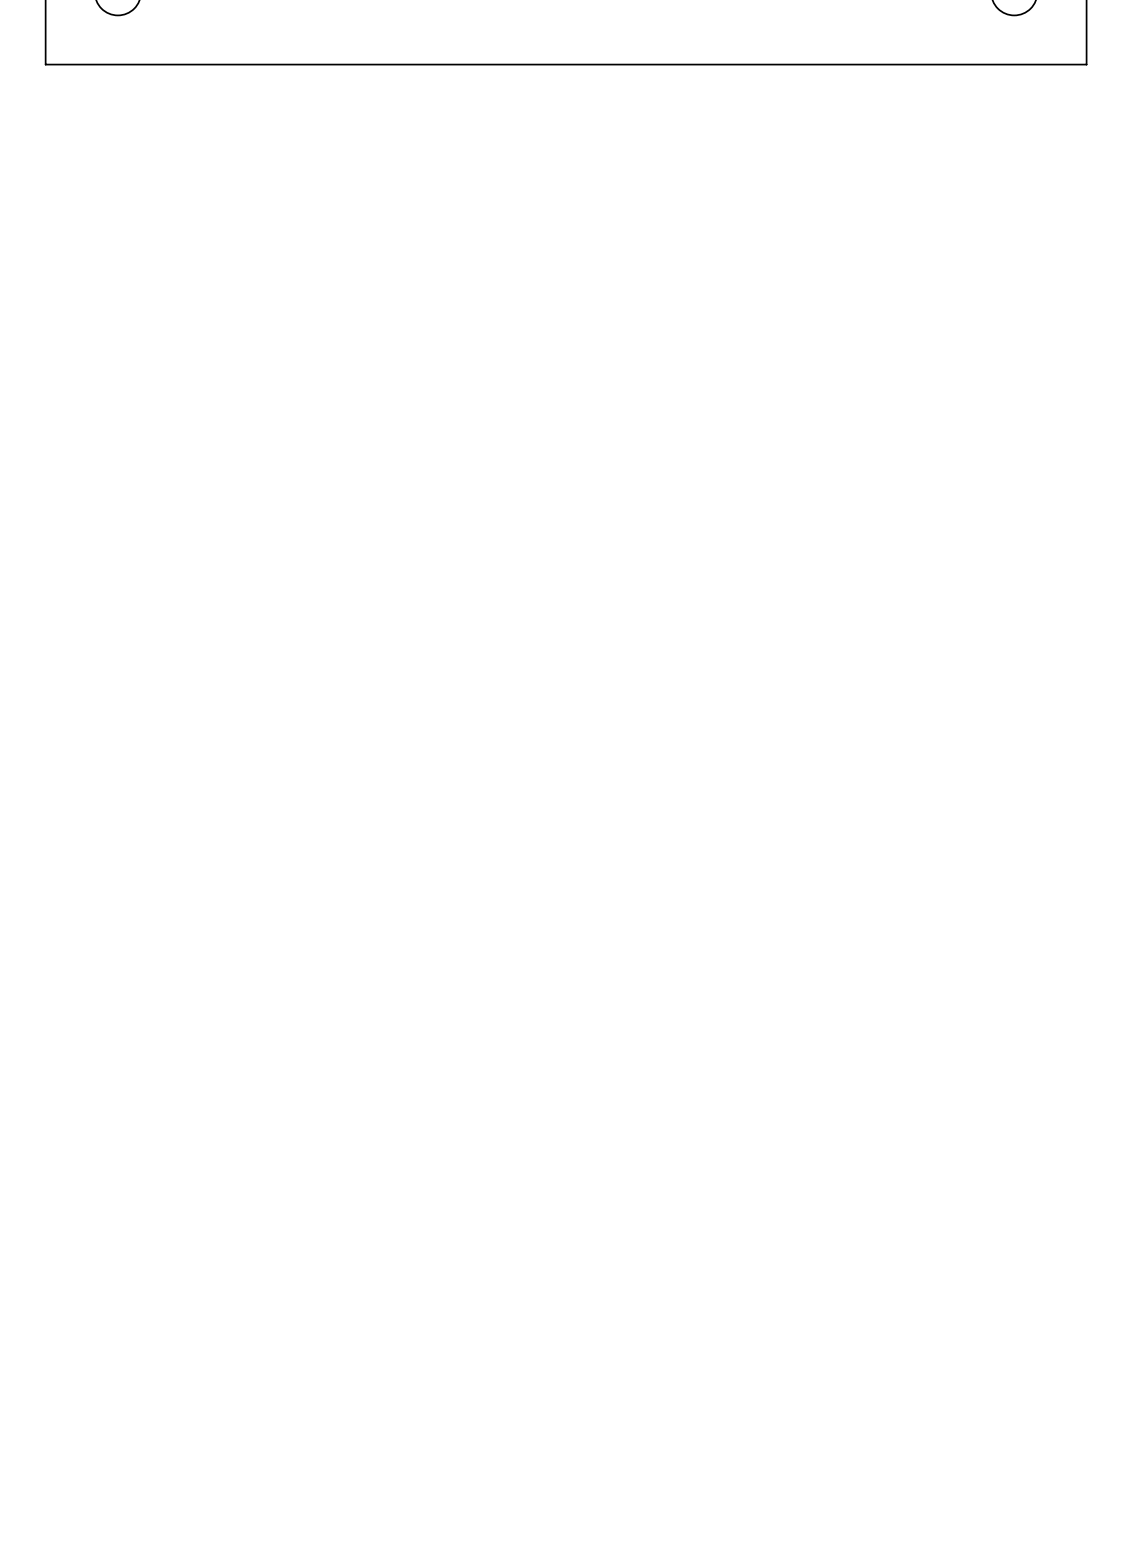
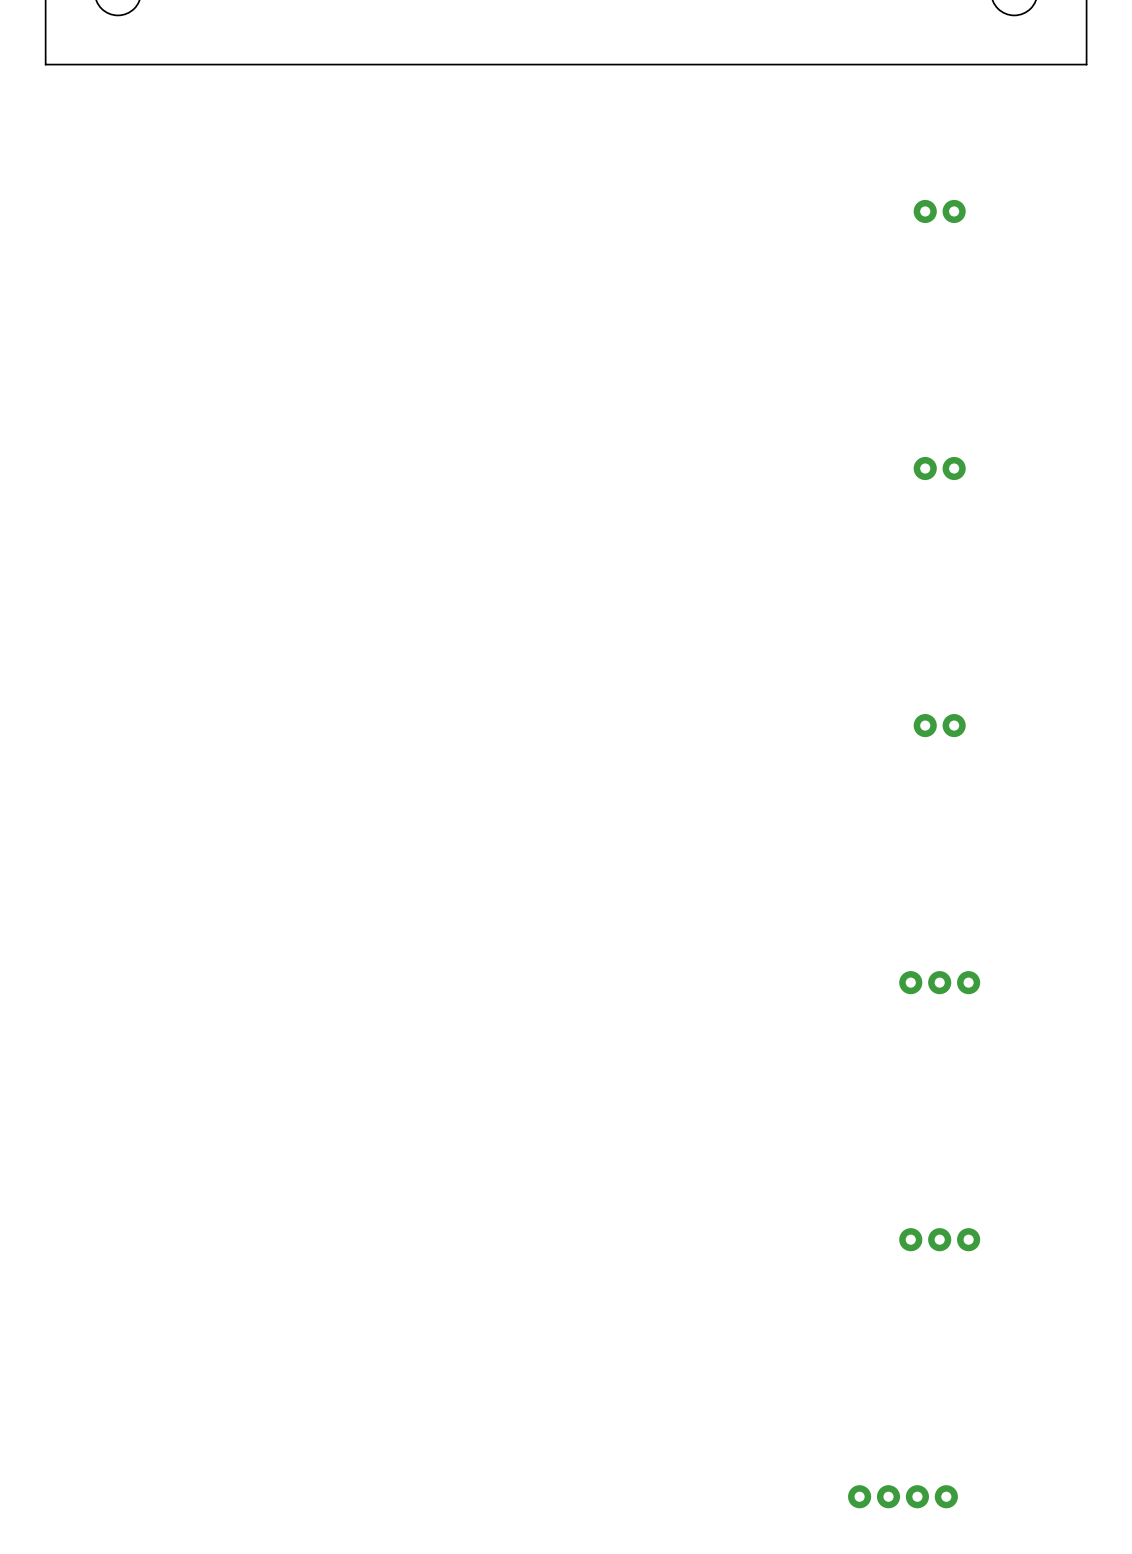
part: none -> (939, 211)
part: none -> (939, 468)
part: none -> (939, 725)
part: none -> (939, 982)
part: none -> (939, 1239)
part: none -> (902, 1496)

